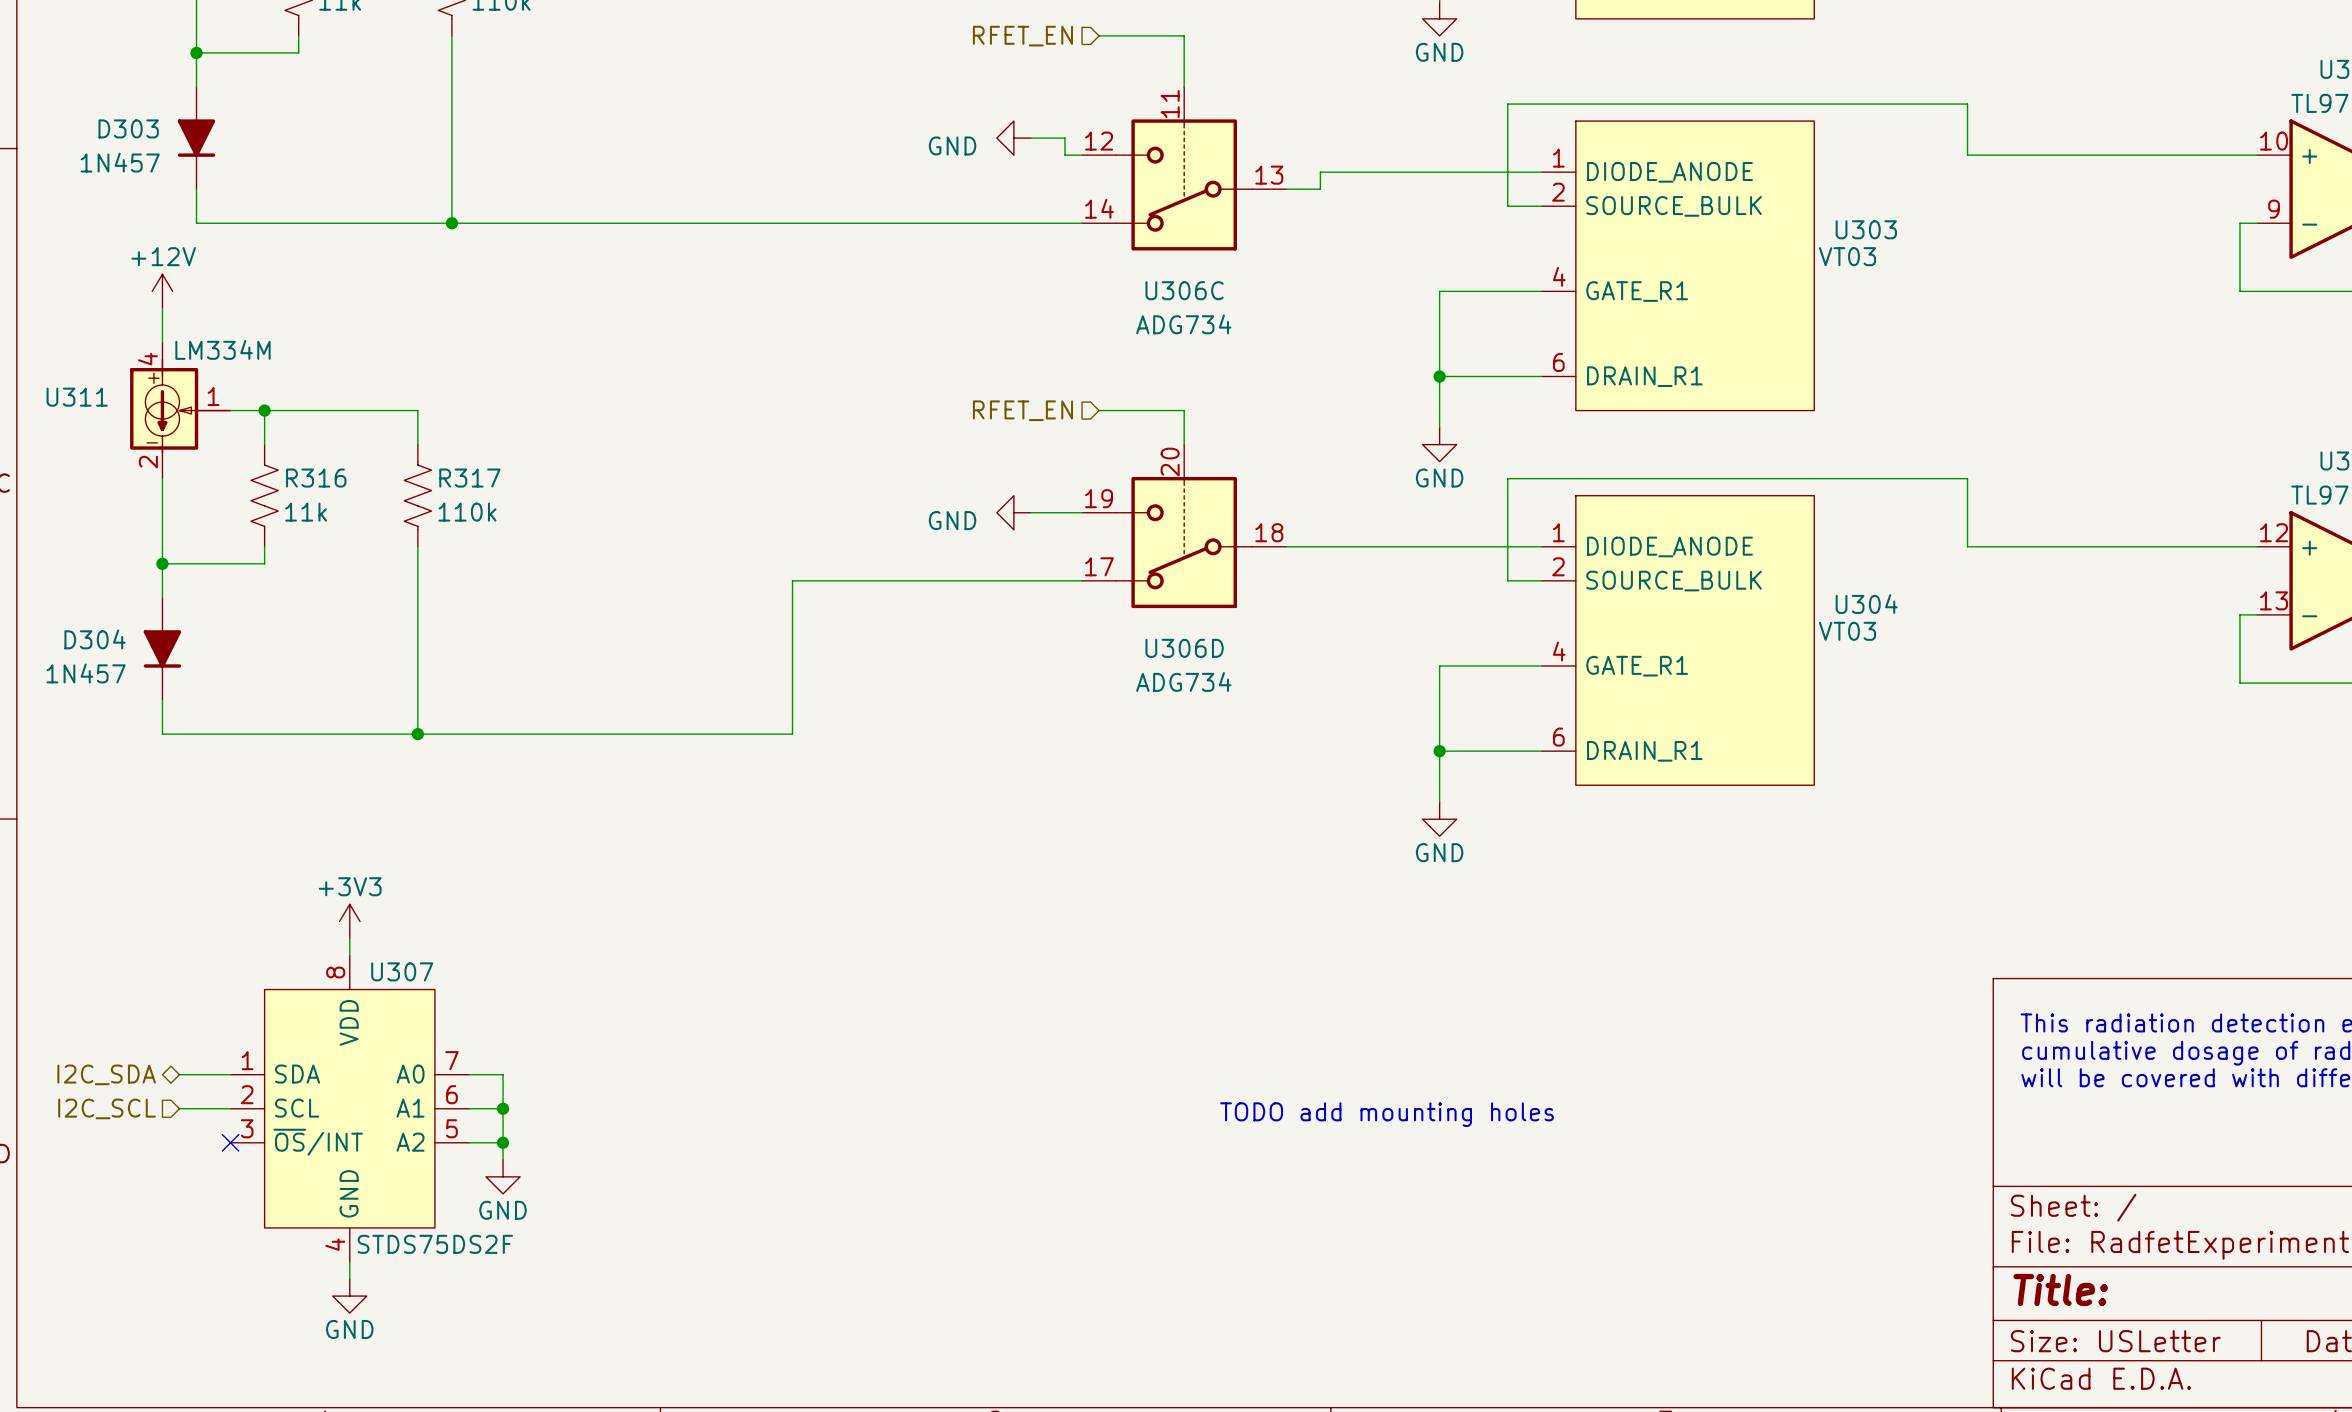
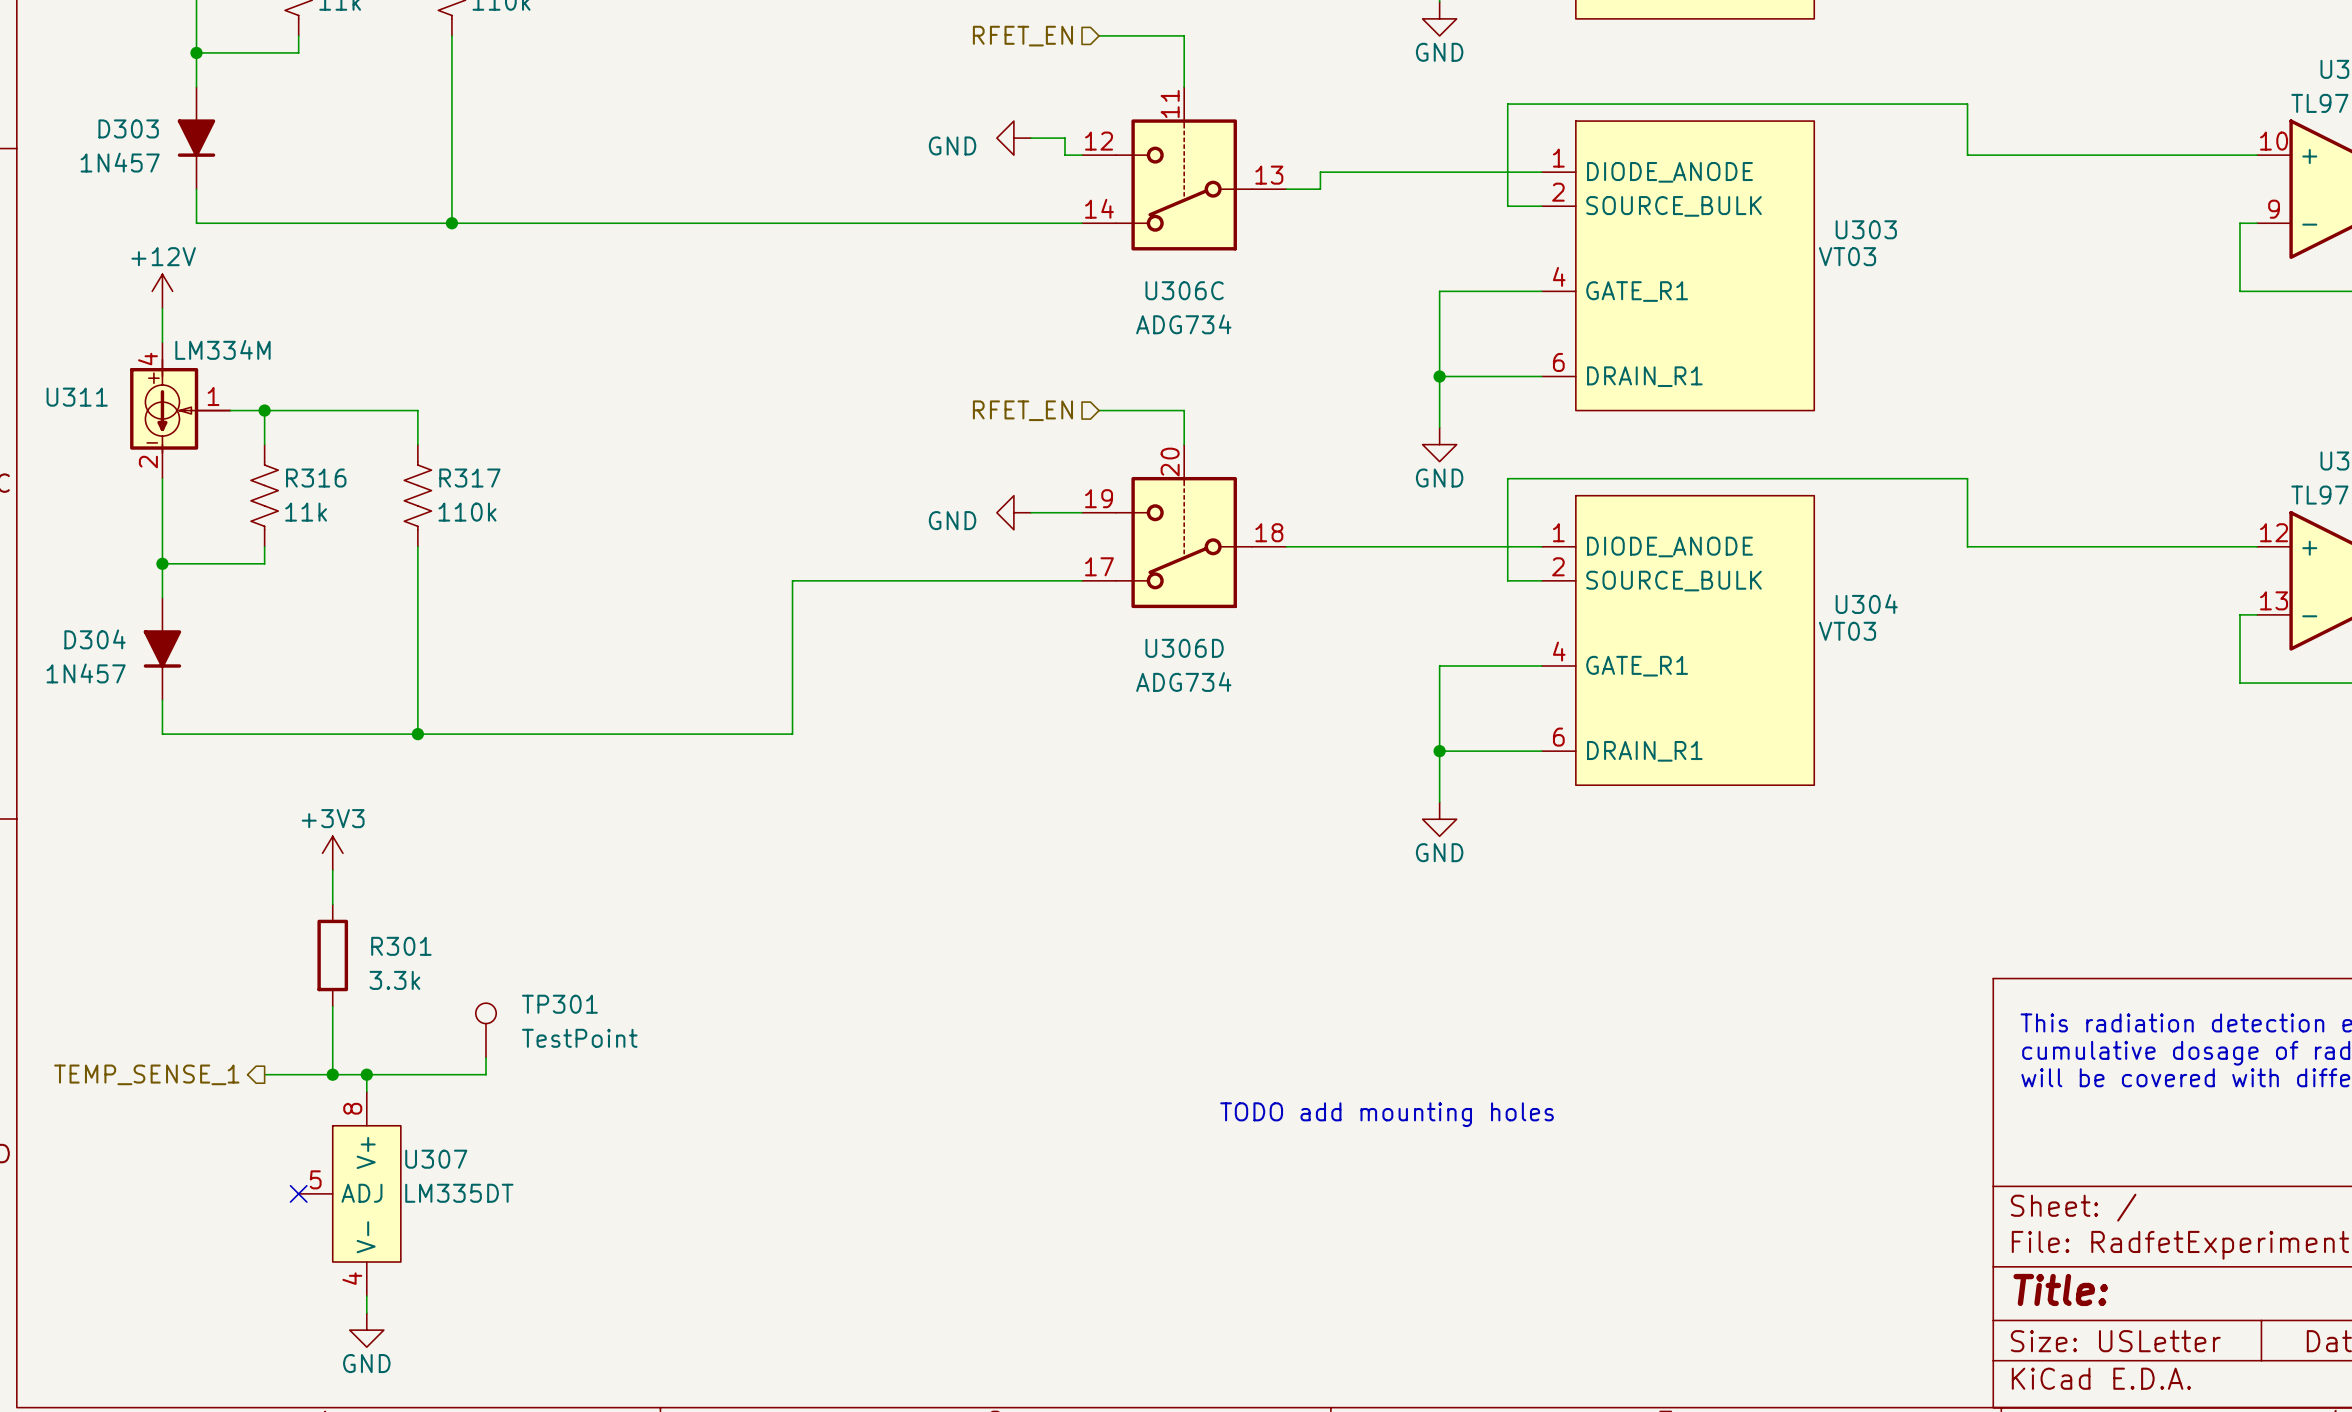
wire: none -> (332, 870) (332, 904)
power symbol position: +3V3 (349, 921) -> +3V3 (332, 853)
U307 symbol: [230, 955, 469, 1263] -> [298, 1091, 401, 1297]
R301: none -> 3.3k (332, 955)
U307 name position: U307 (402, 971) -> U307 (436, 1159)
TP301: none -> TestPoint (486, 1030)
hierarchical label: I2C_SDA (106, 1074) -> none
hierarchical label: none -> TEMP_SENSE_1 (146, 1074)
wire: (179, 1074) (230, 1074) -> none
junction: none -> (332, 1074)
junction: none -> (366, 1074)
wire: (486, 1074) (503, 1074) (503, 1159) -> (486, 1074) (486, 1057)
hierarchical label: I2C_SCL (107, 1108) -> none
wire: (179, 1108) (230, 1108) -> none
wire: (468, 1108) (503, 1108) -> none
junction: (503, 1108) -> none
no-connect mark: (230, 1142) -> none
wire: (468, 1142) (503, 1142) -> none
junction: (503, 1142) -> none
power symbol: GND (503, 1176) -> none
no-connect mark: none -> (298, 1193)
U307 value: STDS75DS2F (435, 1244) -> LM335DT (459, 1193)
wire: (349, 1262) (349, 1279) -> (366, 1296) (366, 1313)
power symbol position: GND (349, 1296) -> GND (366, 1330)

